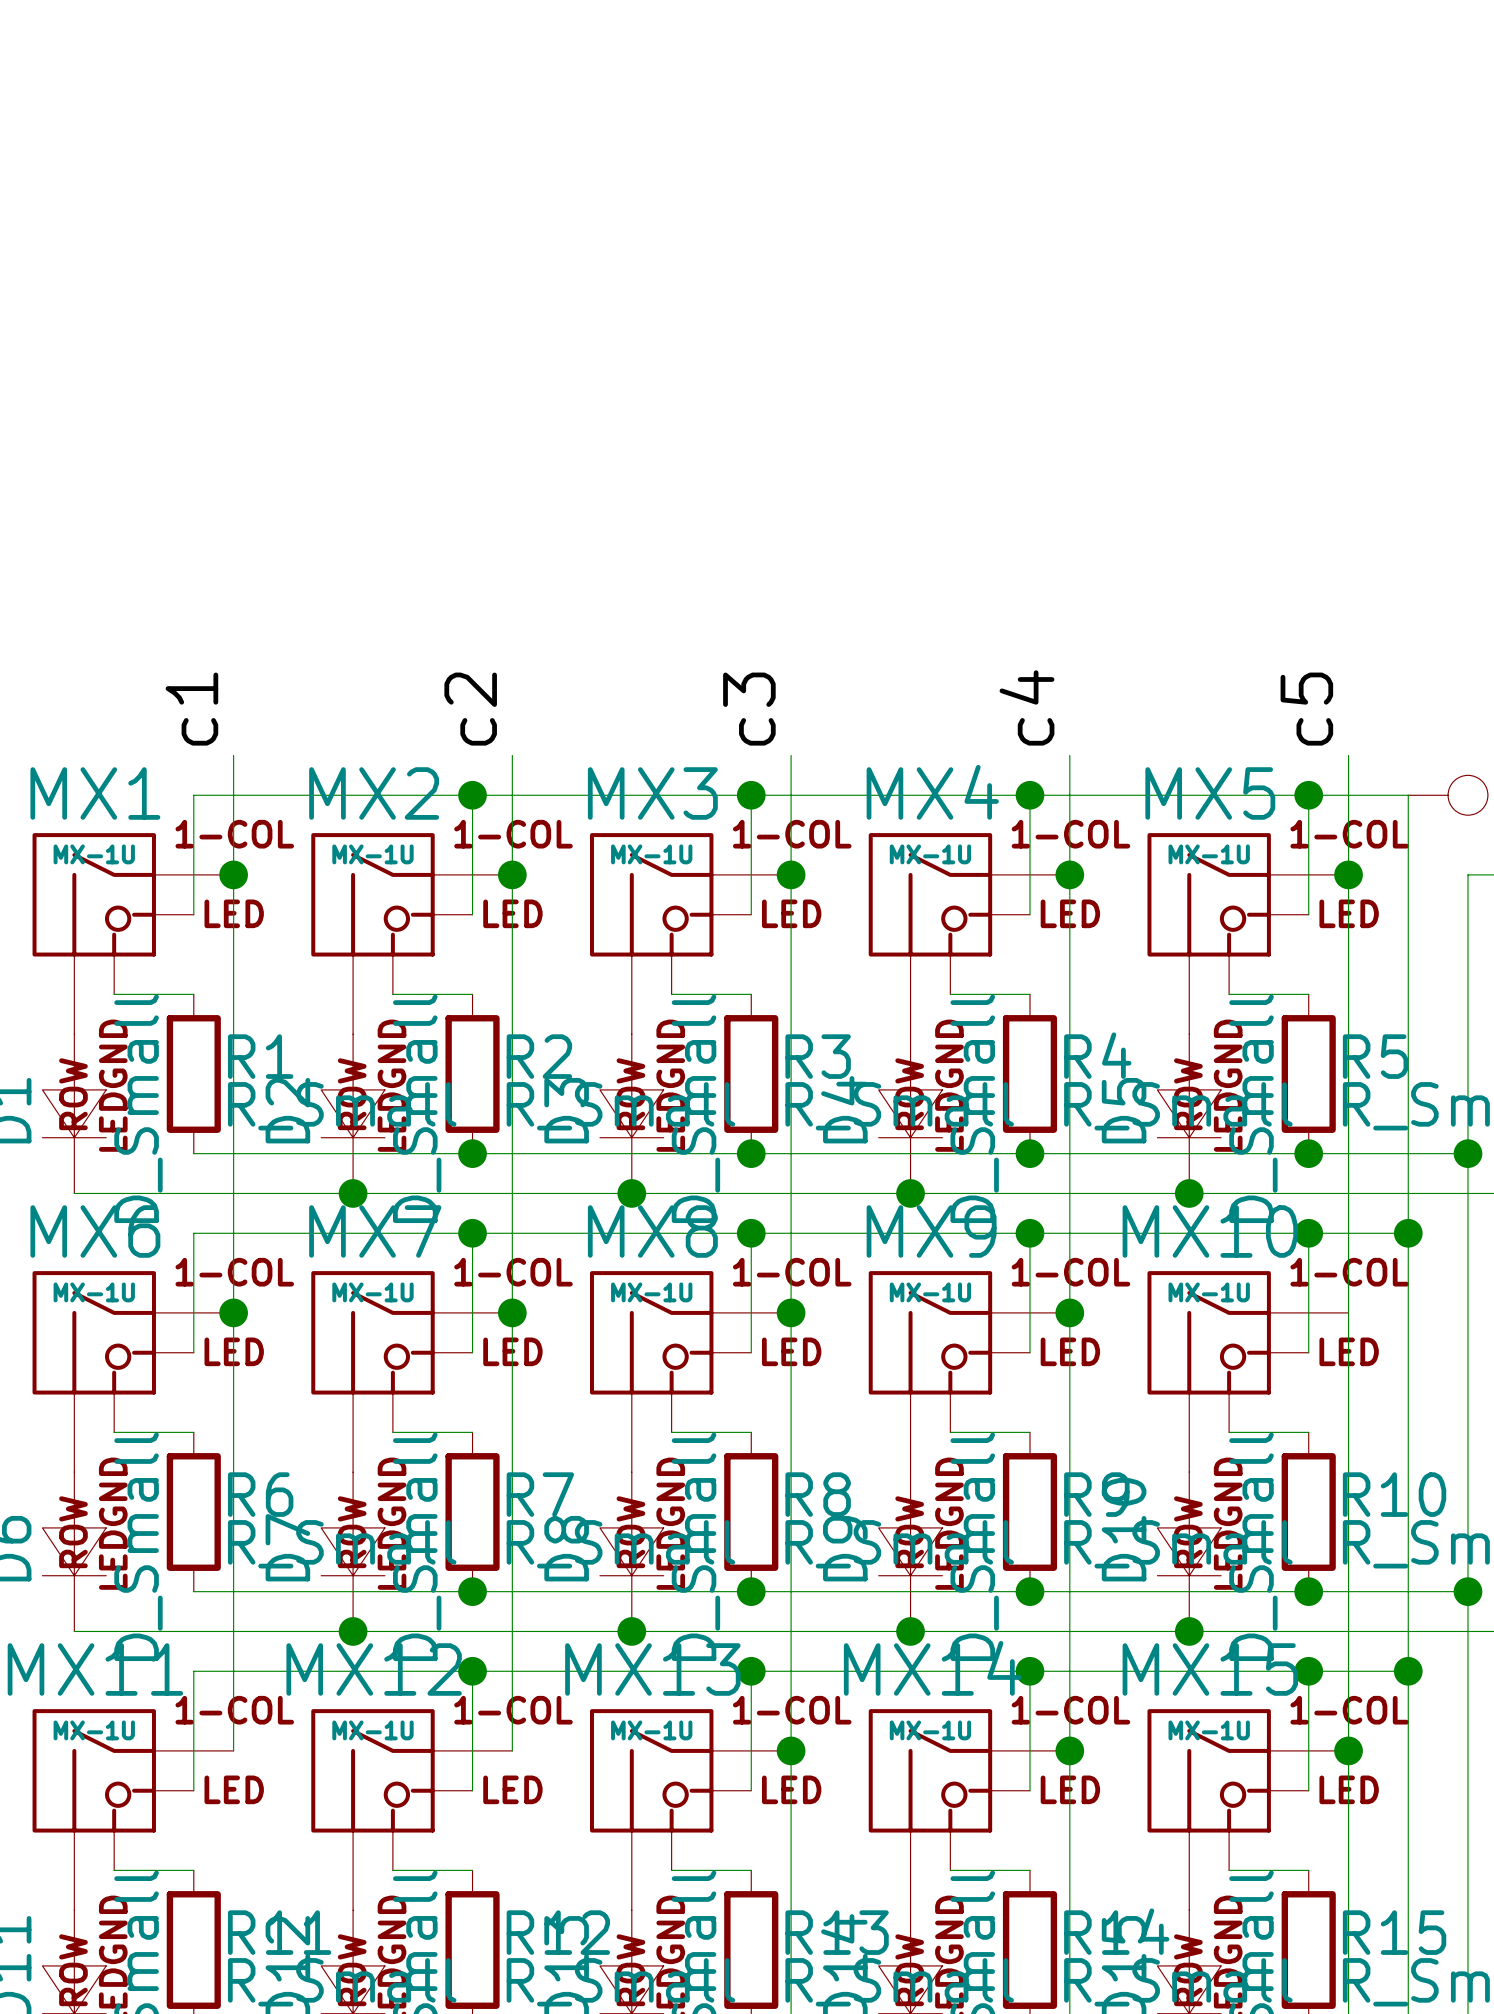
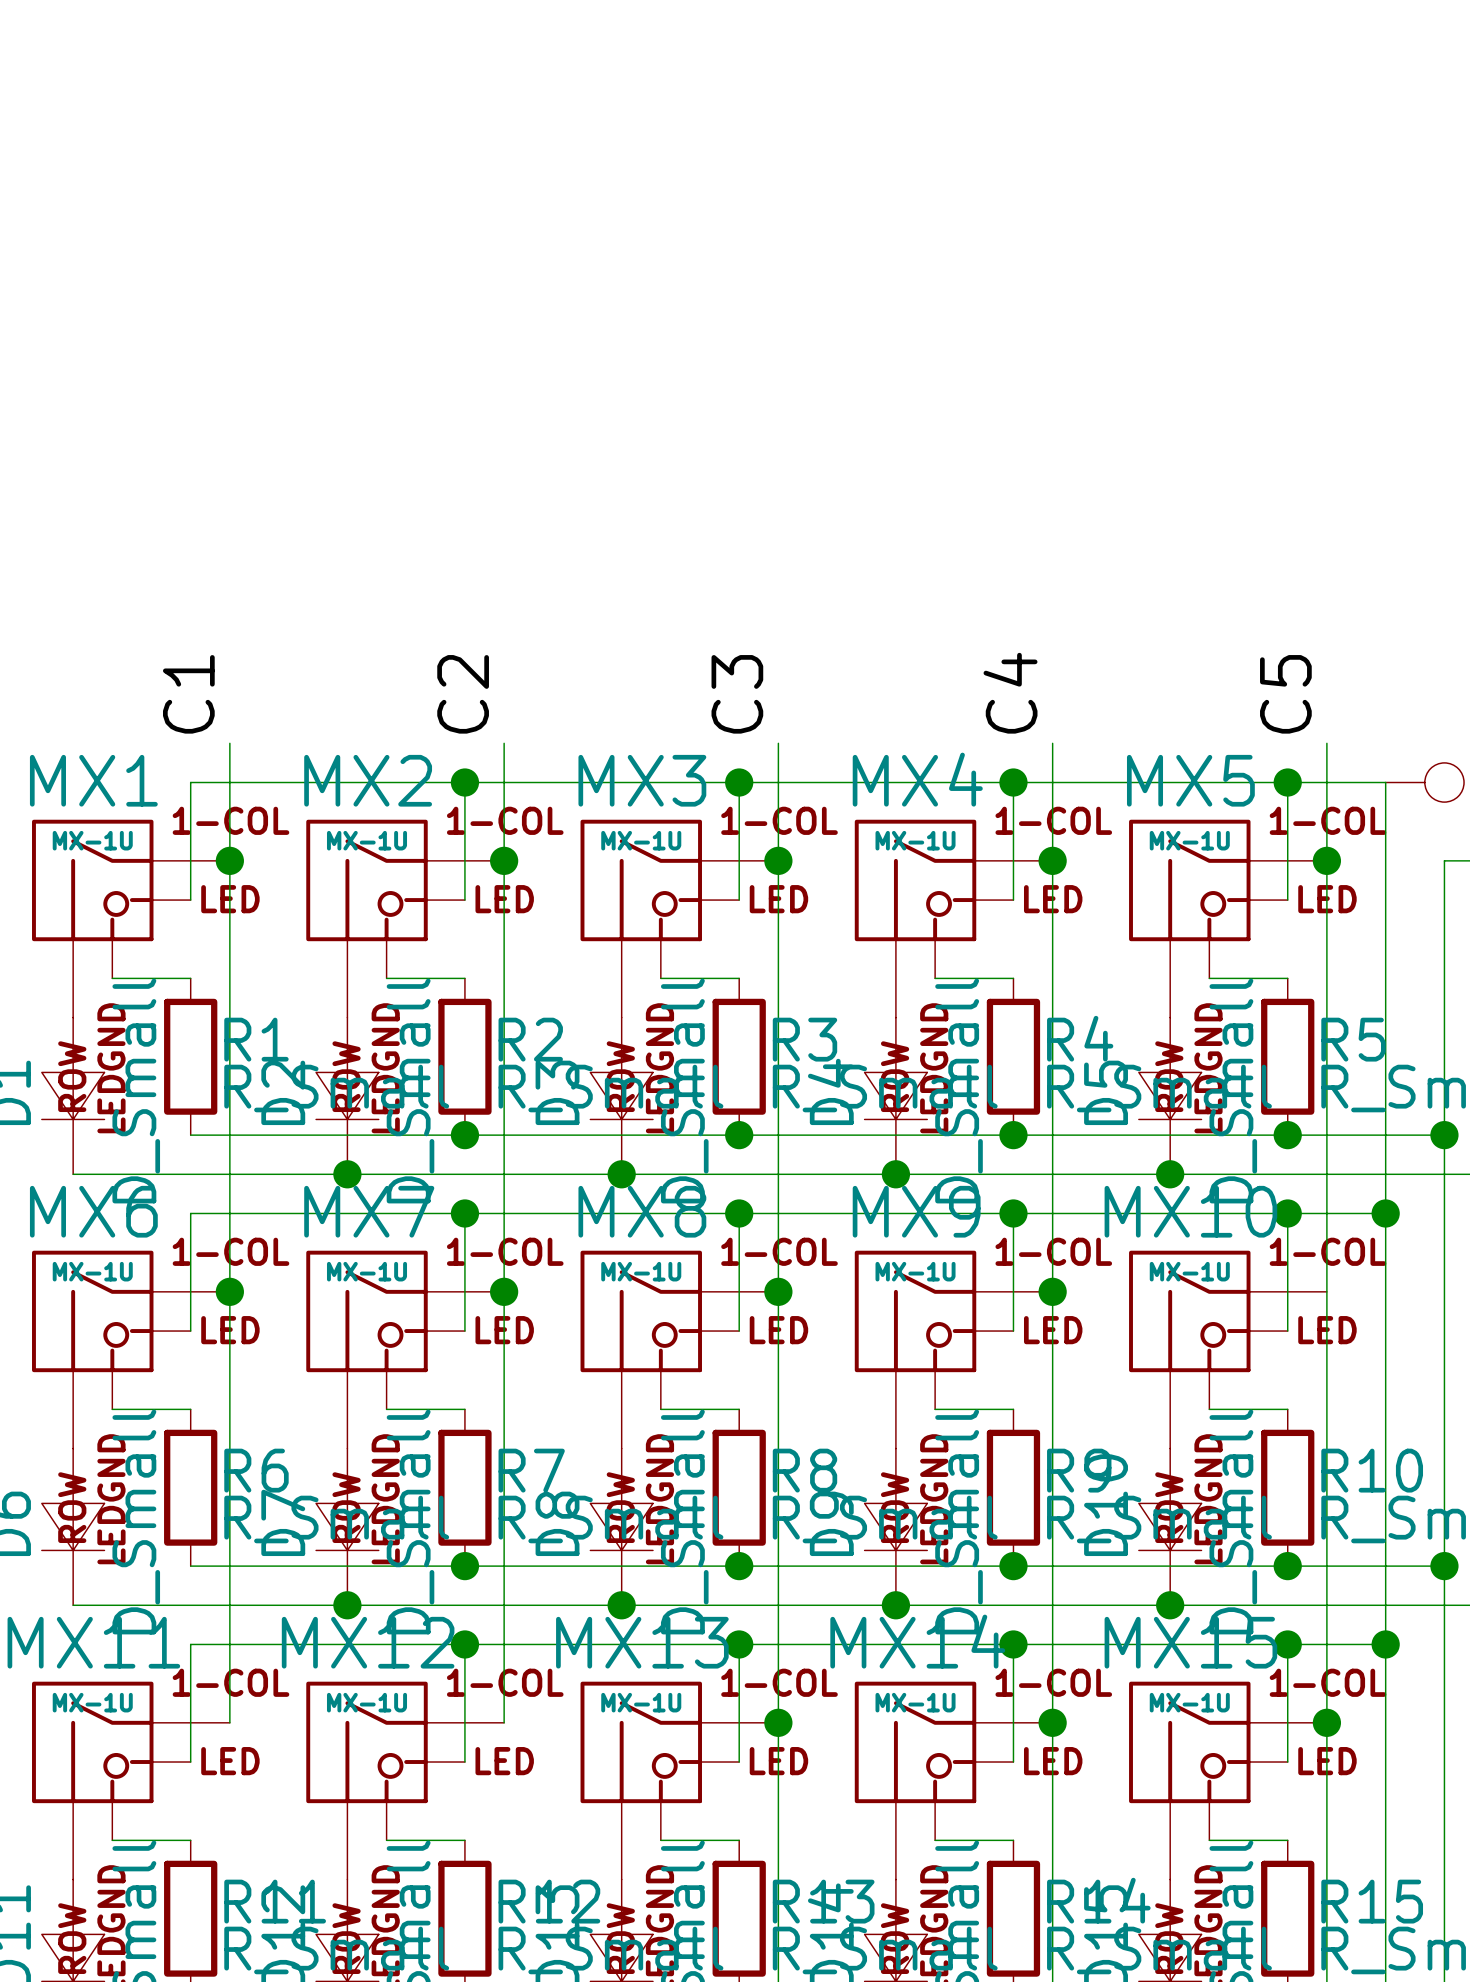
label: c4 (1026, 707) -> C4 (1010, 693)
label: c1 (191, 709) -> C1 (188, 694)
label: c2 (470, 709) -> C2 (463, 694)
label: c3 (749, 709) -> C3 (737, 694)
label: c5 (1306, 709) -> C5 (1285, 694)

